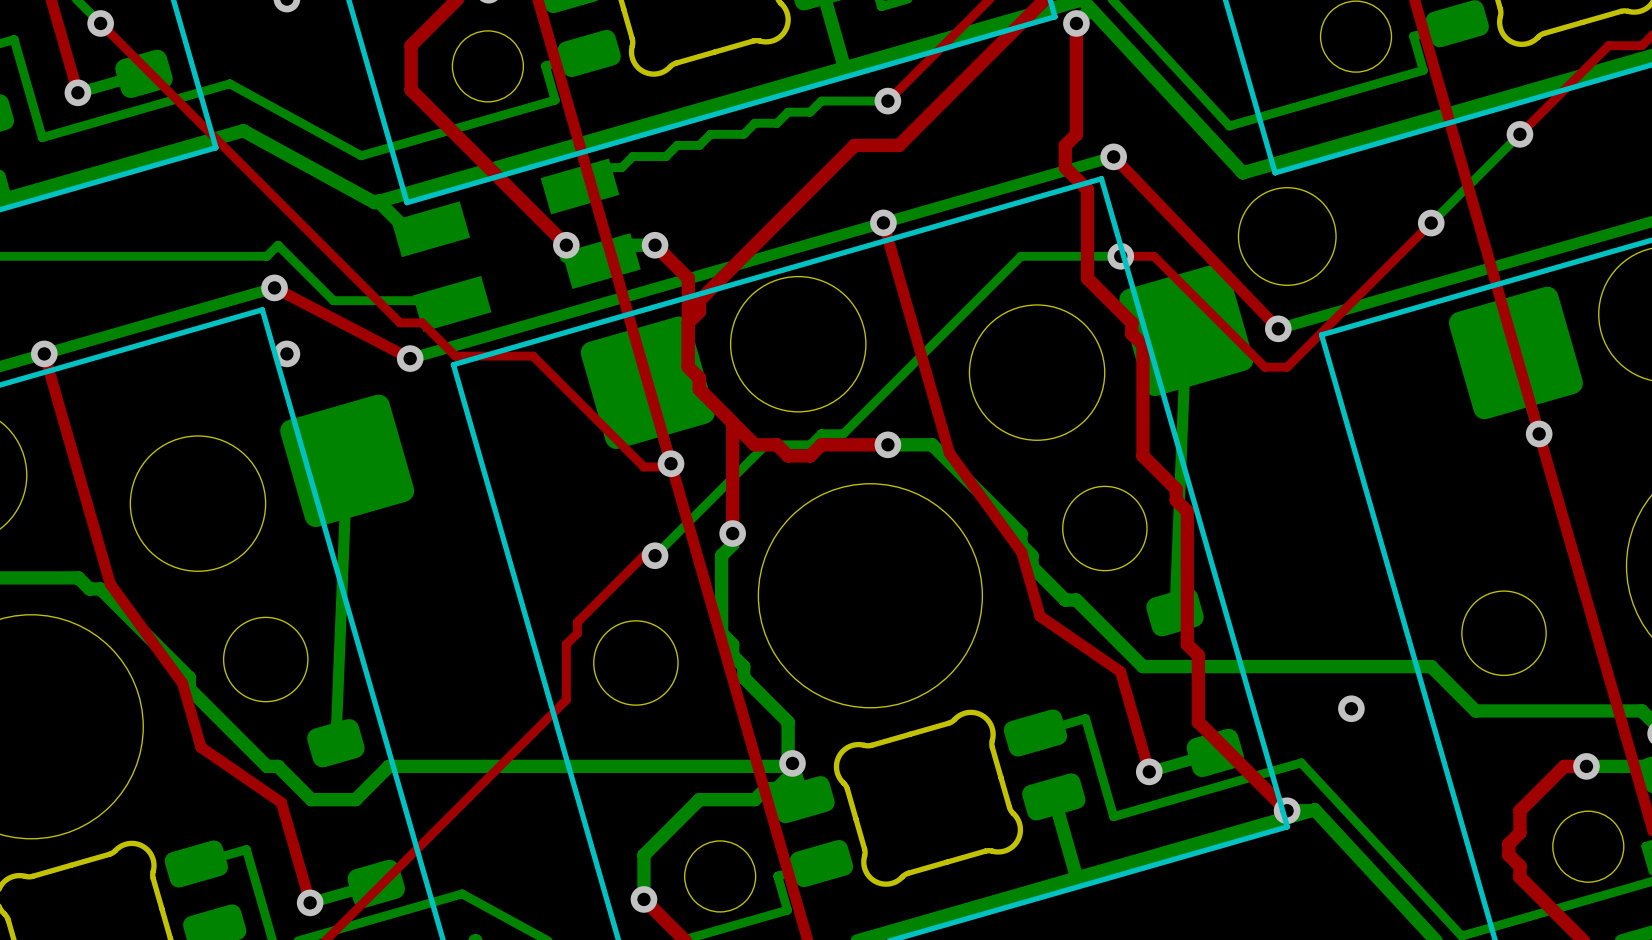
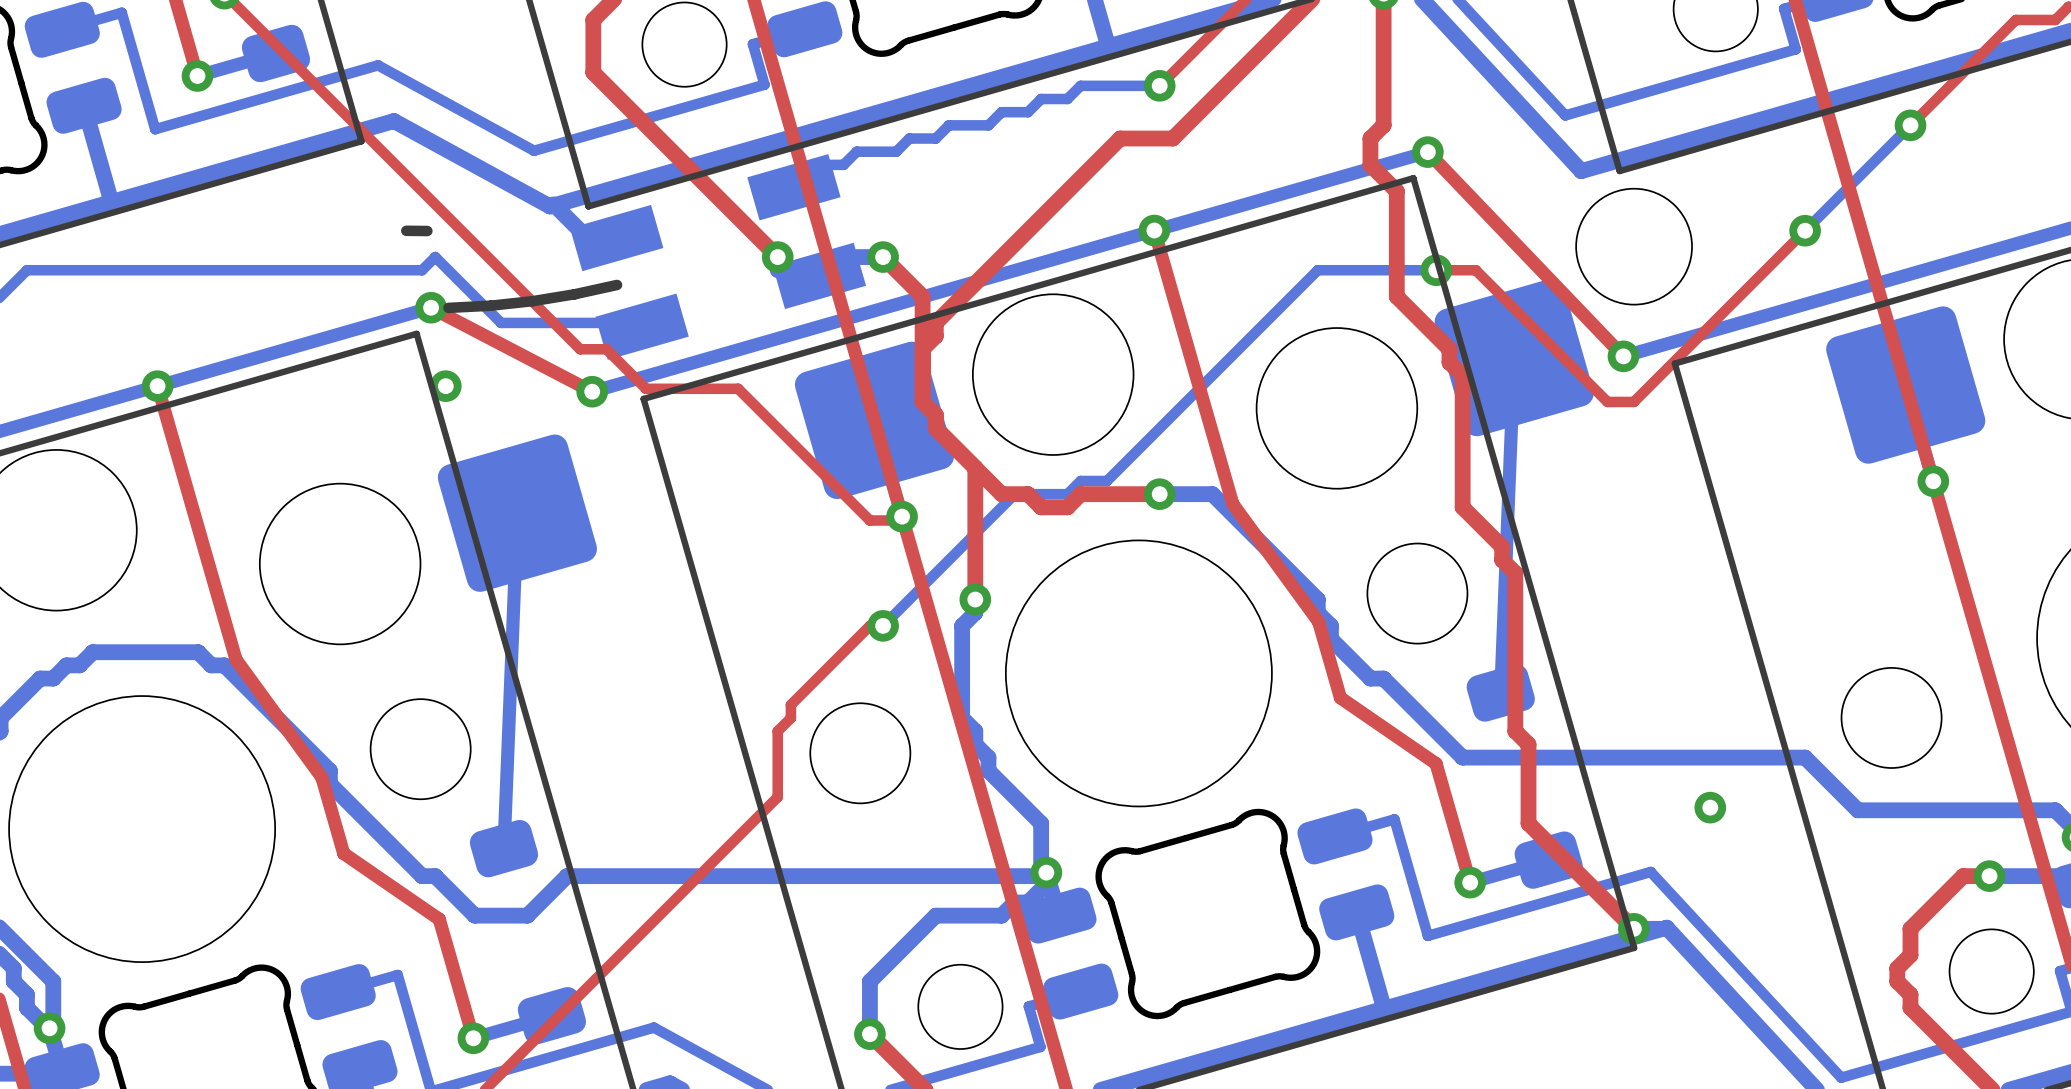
line: none -> (406, 230) (427, 231)
line: none -> (617, 284) (532, 301) (448, 307)

